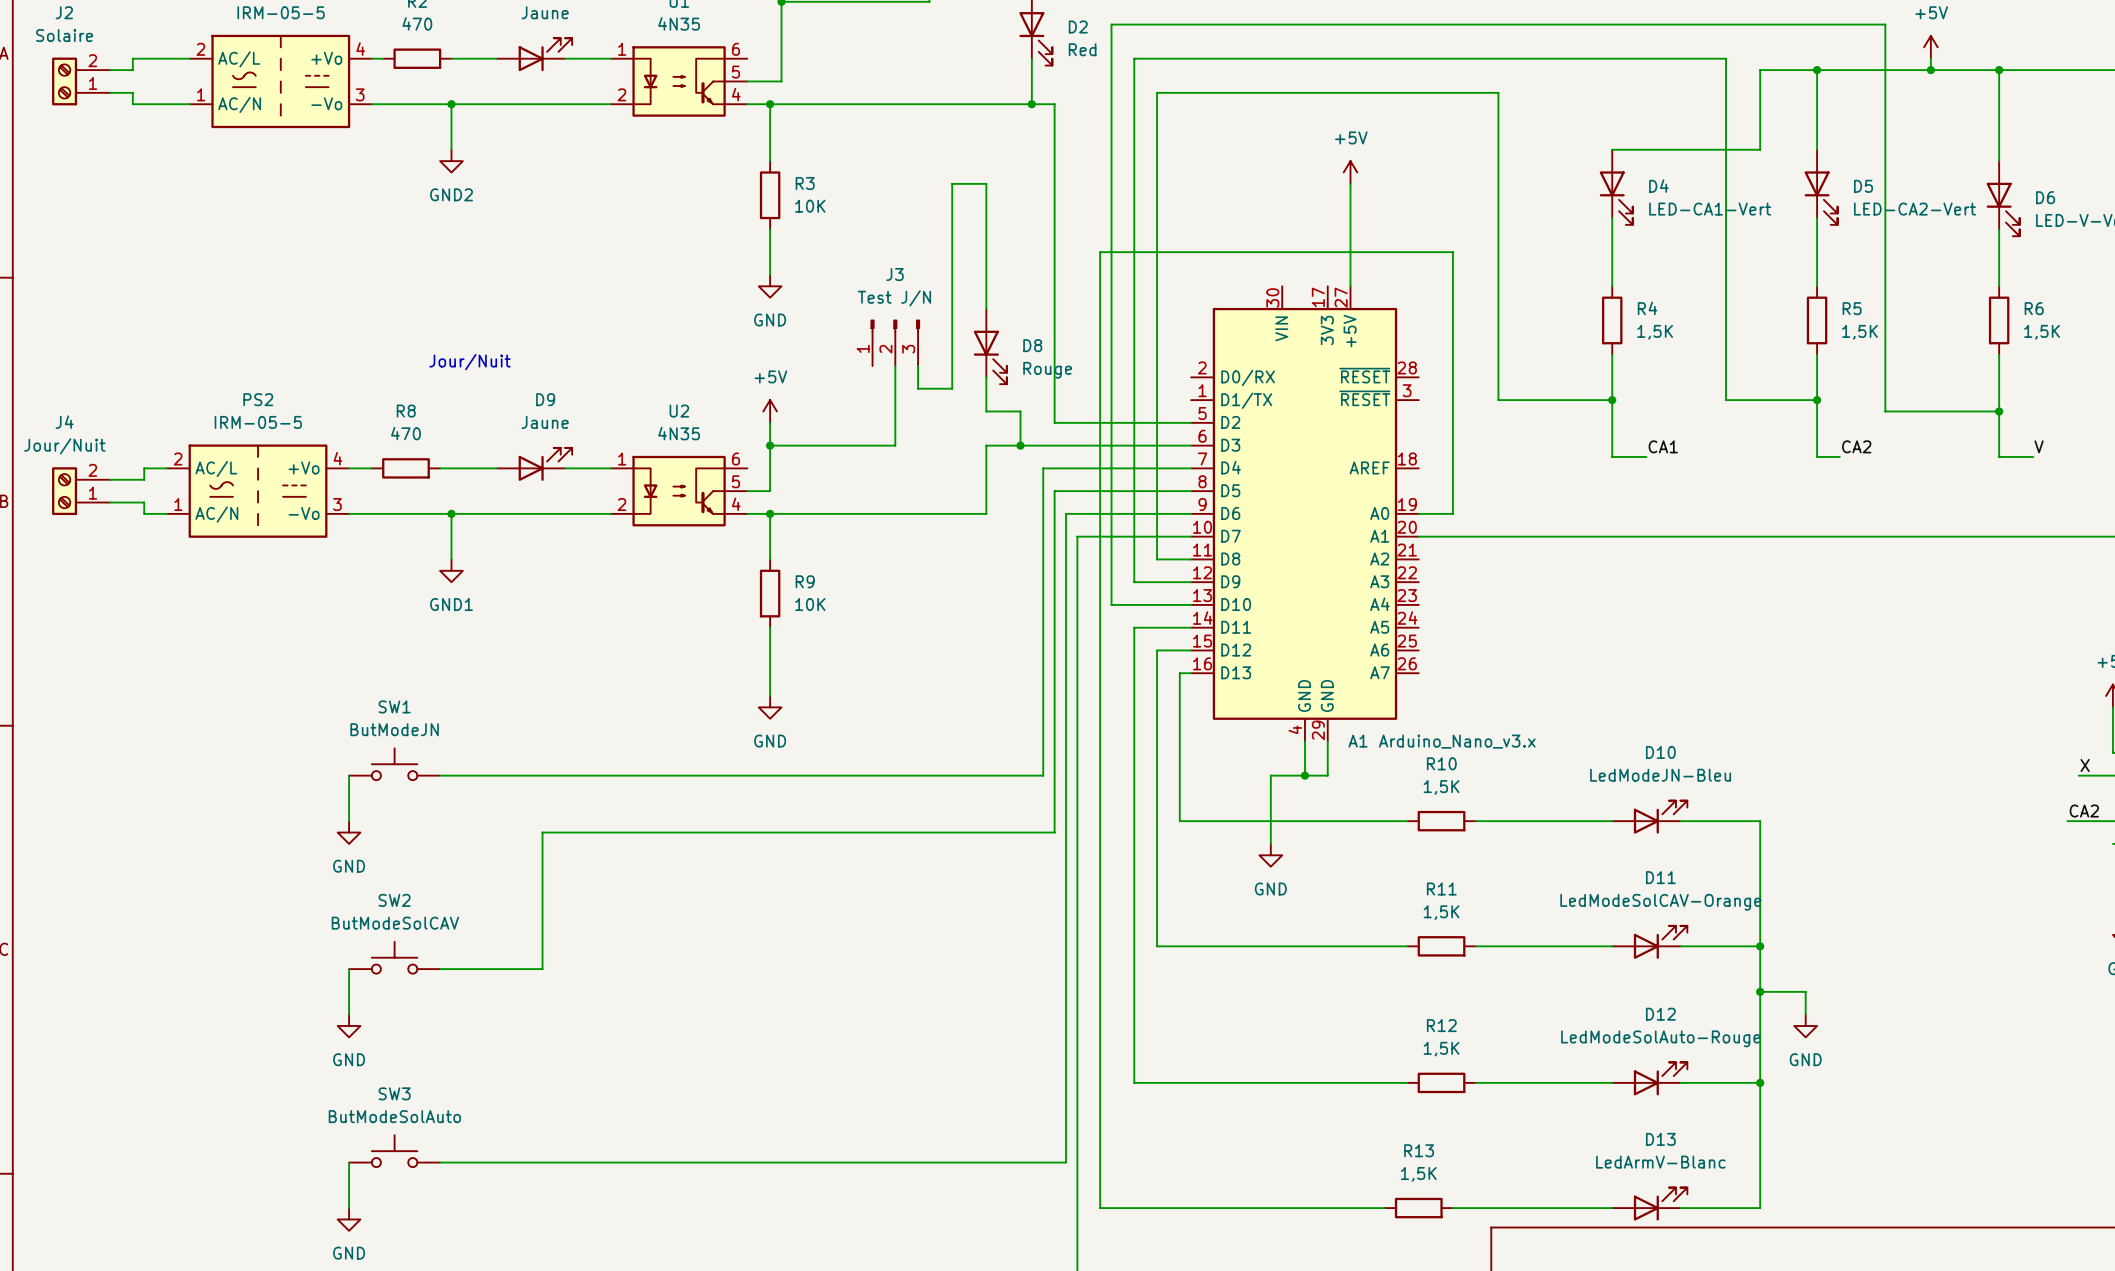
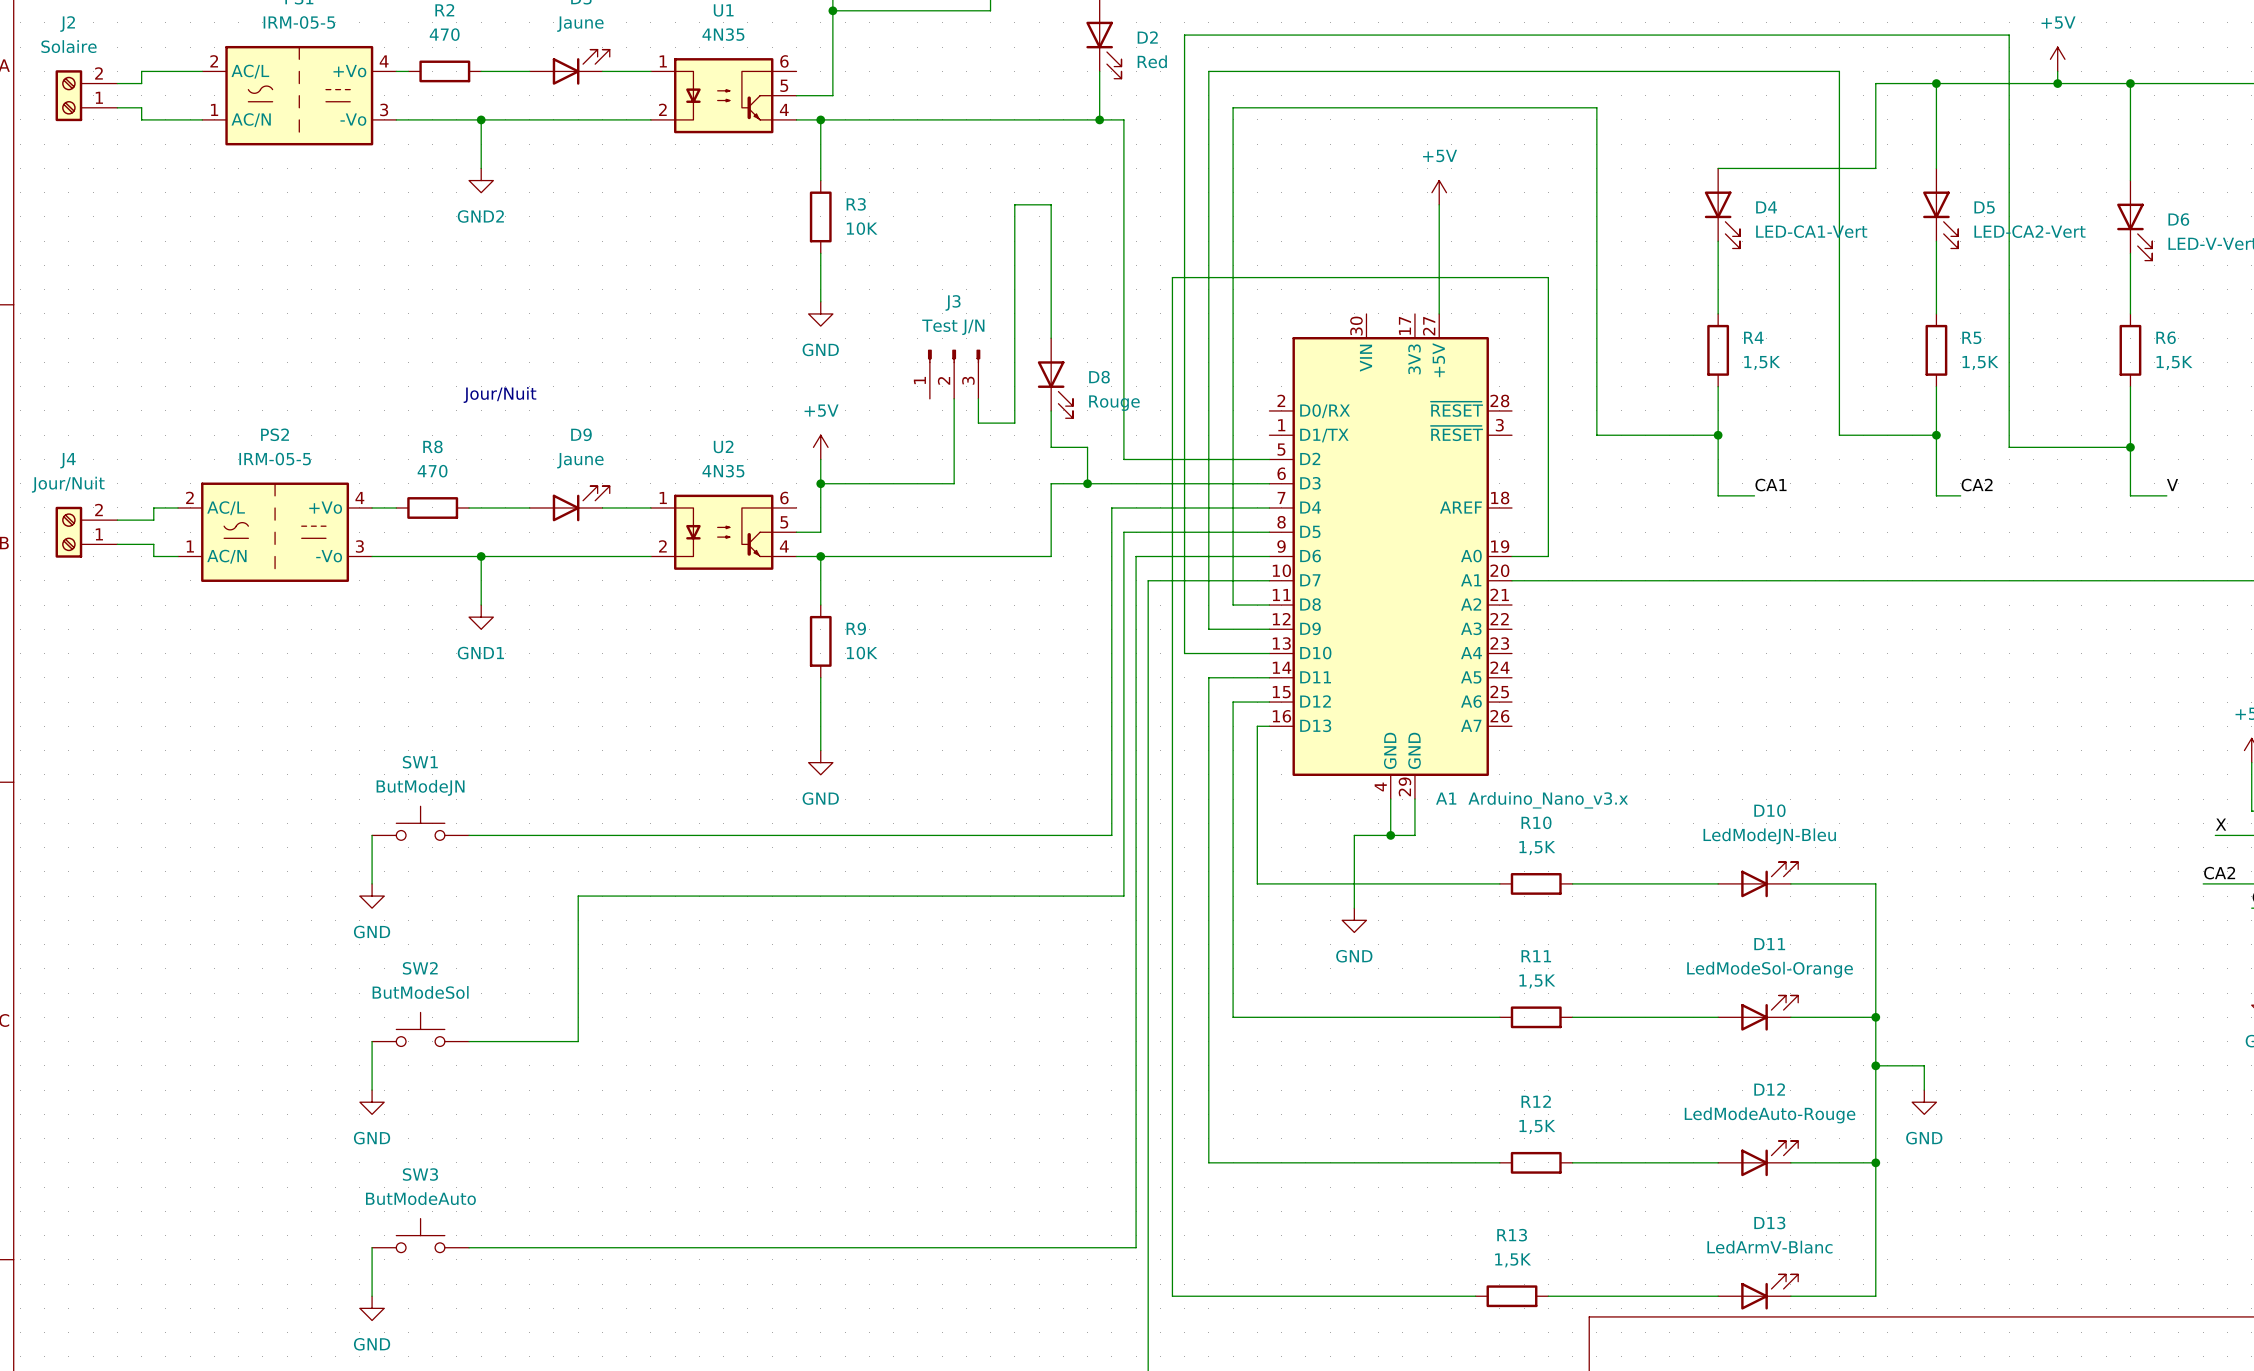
D11 value: LedModeSolCAV-Orange (1660, 902) -> LedModeSol-Orange (1770, 969)
SW2 value: ButModeSolCAV (395, 923) -> ButModeSol (420, 992)
D12 value: LedModeSolAuto-Rouge (1660, 1038) -> LedModeAuto-Rouge (1770, 1115)
SW3 value: ButModeSolAuto (394, 1116) -> ButModeAuto (420, 1198)

